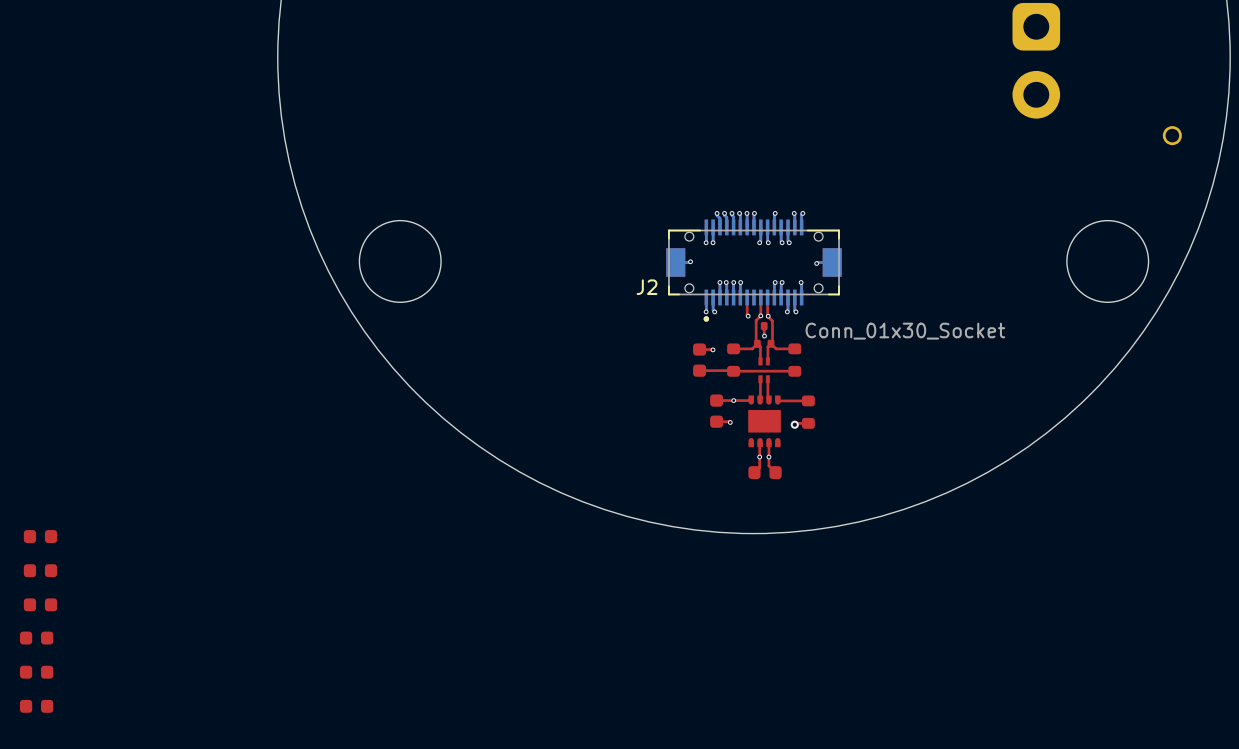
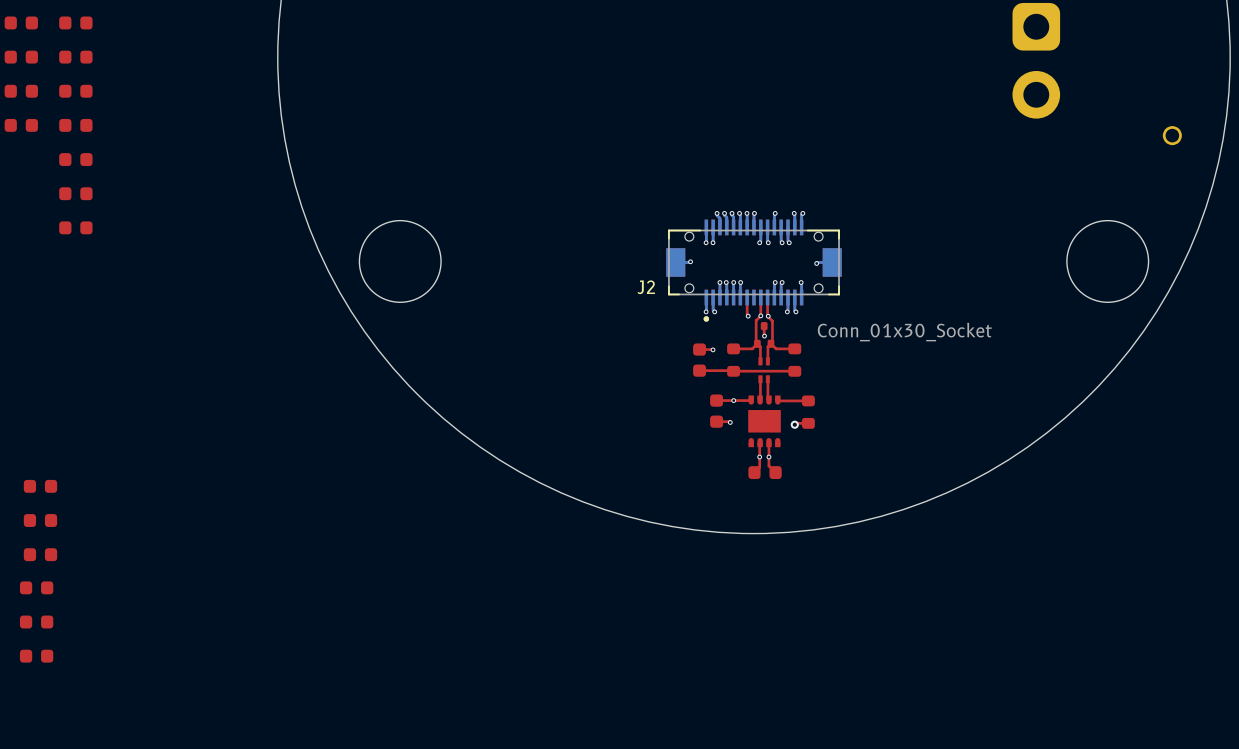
part: none -> (21, 22)
part: none -> (75, 22)
part: none -> (21, 57)
part: none -> (75, 57)
part: none -> (21, 91)
part: none -> (75, 91)
part: none -> (21, 125)
part: none -> (75, 125)
part: none -> (75, 159)
part: none -> (75, 193)
part: none -> (75, 227)
part: none -> (40, 486)
part: none -> (40, 520)
part: (40, 536) -> none
part: none -> (40, 554)
part: (40, 570) -> none
part: none -> (36, 587)
part: (40, 604) -> none
part: none -> (36, 622)
part: (36, 638) -> none
part: none -> (36, 656)
part: (36, 672) -> none
part: (36, 706) -> none

